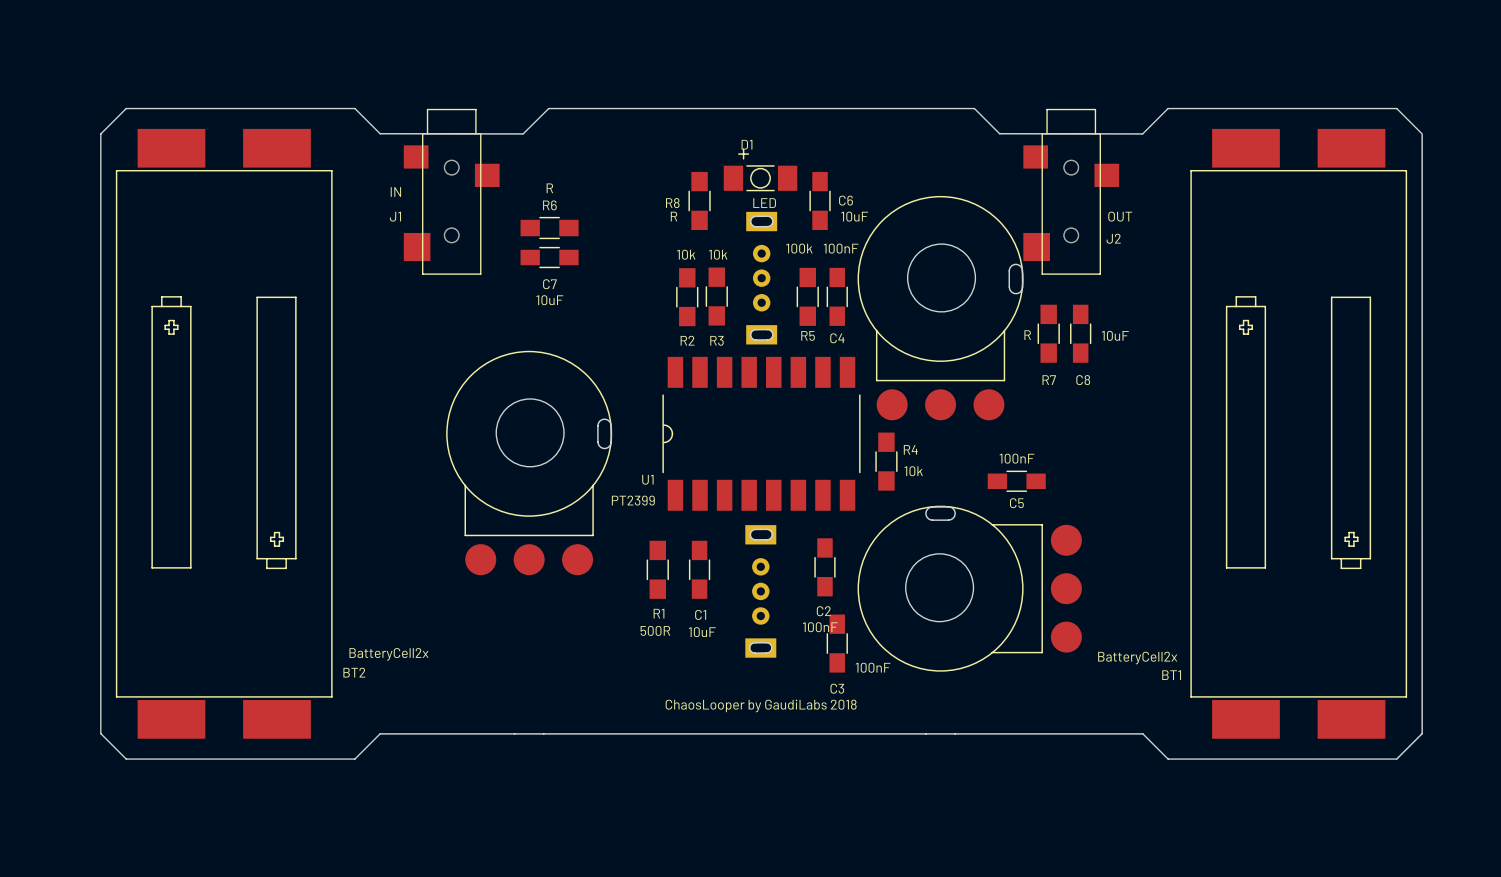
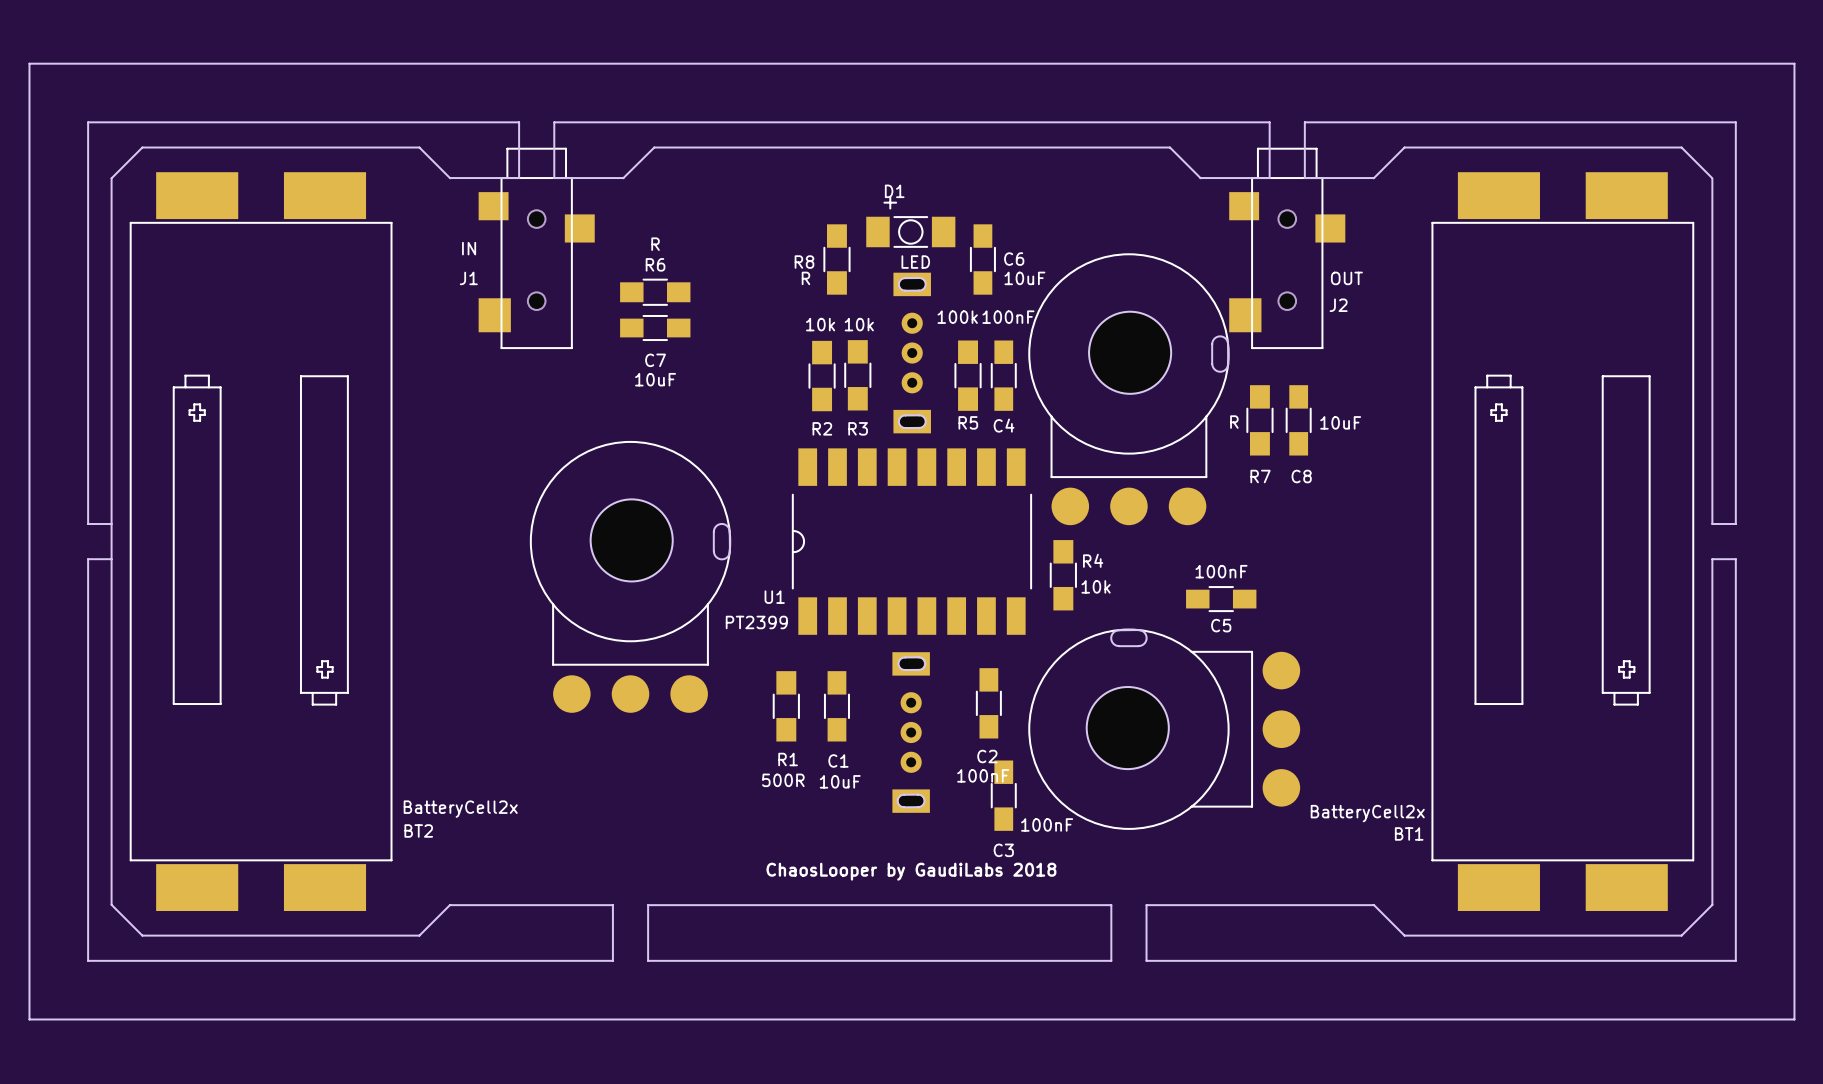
board edge: none -> (29, 63) (29, 1019) (1794, 1019) (1794, 63) (29, 63)
board edge: (380, 133) (523, 133) -> (449, 178) (519, 178) (519, 122) (88, 122) (88, 524) (111, 524)
board edge: (999, 133) (1142, 133) -> (1200, 178) (1269, 178) (1269, 122) (554, 122) (554, 178) (623, 178)
board edge: (1422, 419) (1422, 448) -> (1712, 524) (1735, 524) (1735, 122) (1304, 122) (1304, 178) (1374, 178)
board edge: none -> (111, 559) (88, 559) (88, 960) (612, 960) (612, 905)
board edge: (514, 733) (543, 733) -> (1111, 905) (1111, 960) (648, 960) (648, 905)
board edge: (926, 733) (955, 733) -> (1712, 559) (1735, 559) (1735, 960) (1146, 960) (1146, 905)

